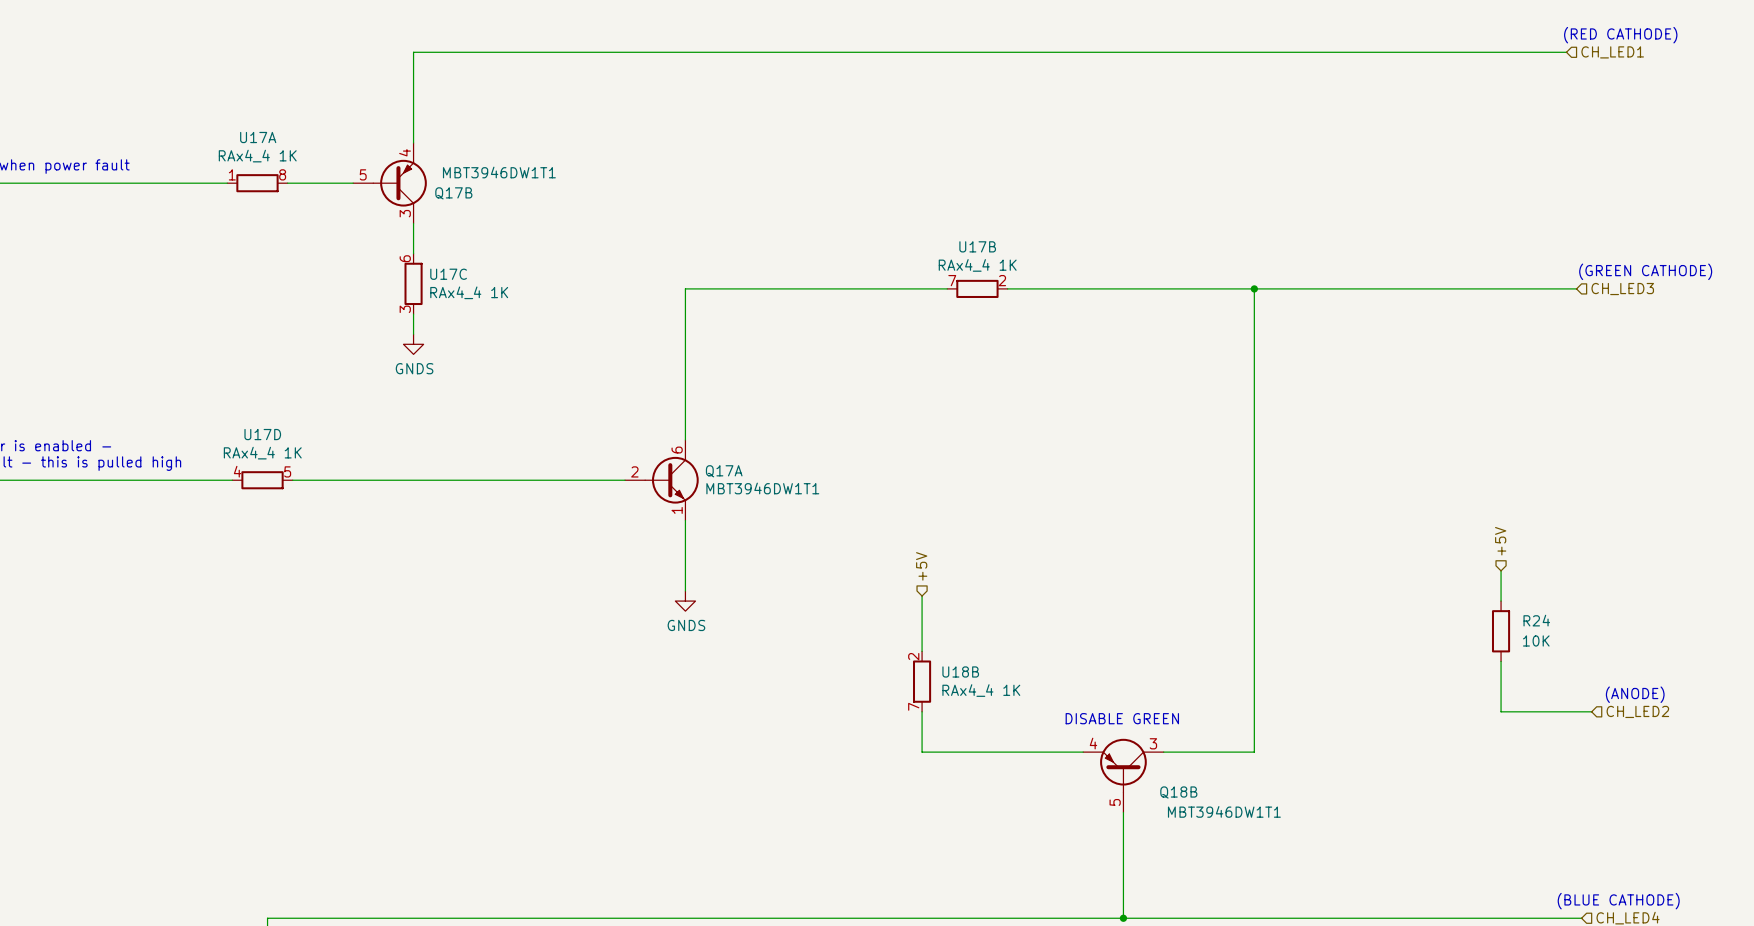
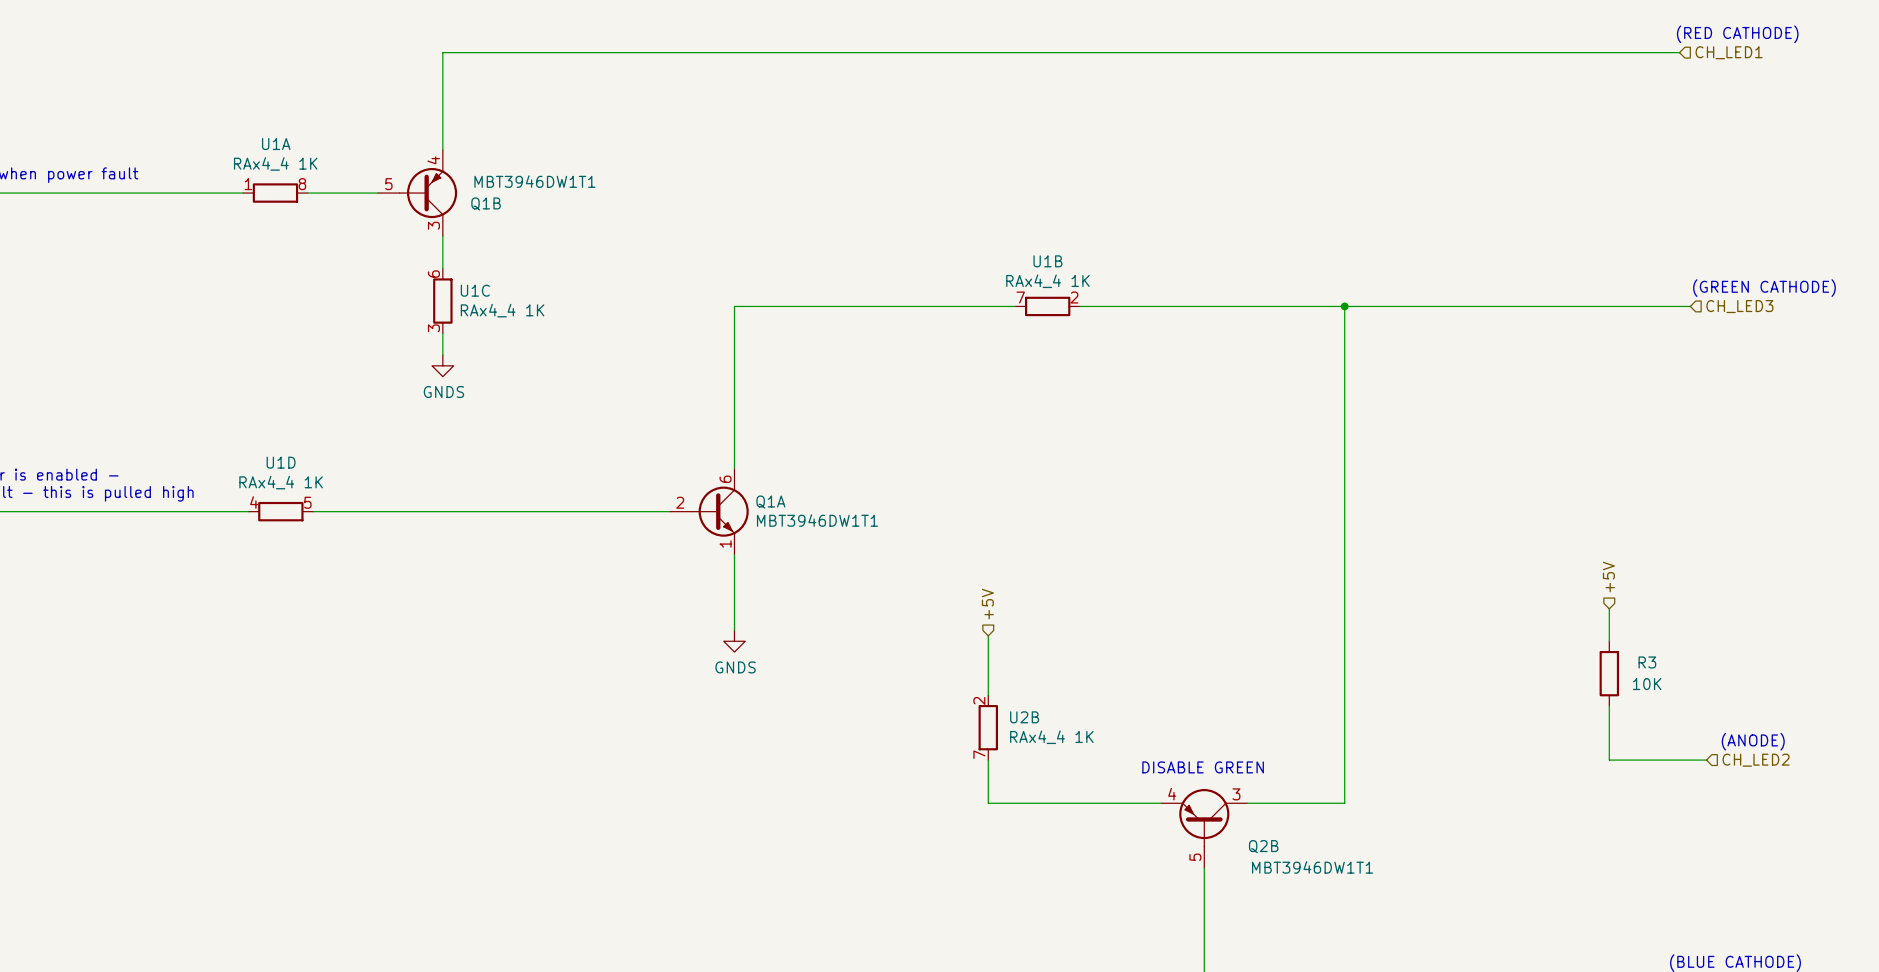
U17A name: U17A (258, 137) -> U1A (276, 144)
Q17B name: Q17B (453, 193) -> Q1B (486, 203)
U17B name: U17B (977, 246) -> U1B (1047, 261)
U17C name: U17C (448, 274) -> U1C (475, 290)
U17D name: U17D (262, 434) -> U1D (281, 462)
Q17A name: Q17A (724, 471) -> Q1A (770, 502)
R24 name: R24 (1536, 620) -> R3 (1647, 662)
U18B name: U18B (960, 671) -> U2B (1024, 717)
Q18B name: Q18B (1178, 792) -> Q2B (1263, 846)

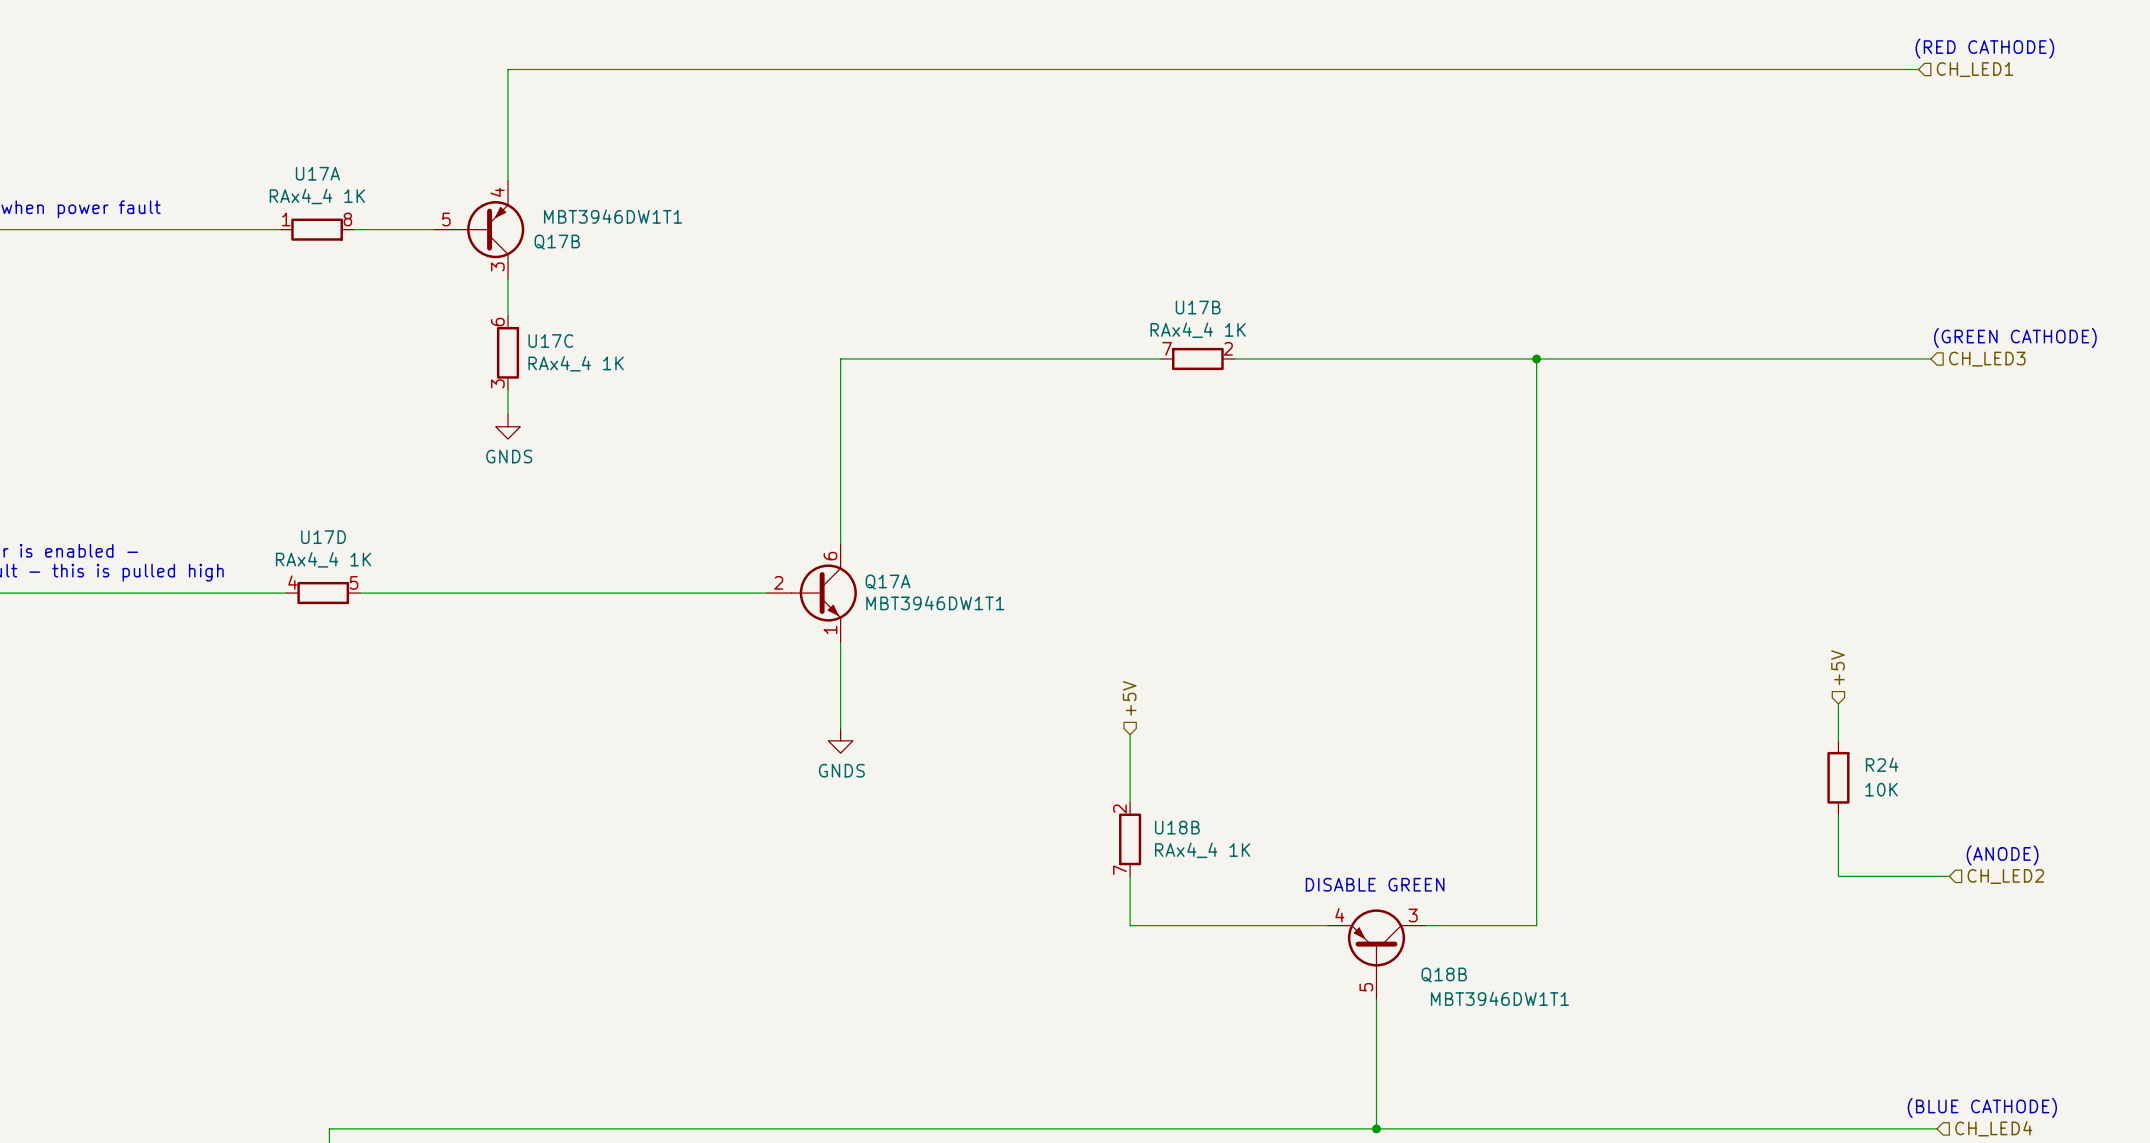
U1A name: U1A (276, 144) -> U17A (317, 173)
Q1B name: Q1B (486, 203) -> Q17B (557, 242)
U1B name: U1B (1047, 261) -> U17B (1198, 307)
U1C name: U1C (475, 290) -> U17C (550, 341)
U1D name: U1D (281, 462) -> U17D (323, 537)
Q1A name: Q1A (770, 502) -> Q17A (888, 582)
R3 name: R3 (1647, 662) -> R24 (1882, 764)
U2B name: U2B (1024, 717) -> U18B (1177, 827)
Q2B name: Q2B (1263, 846) -> Q18B (1444, 975)

